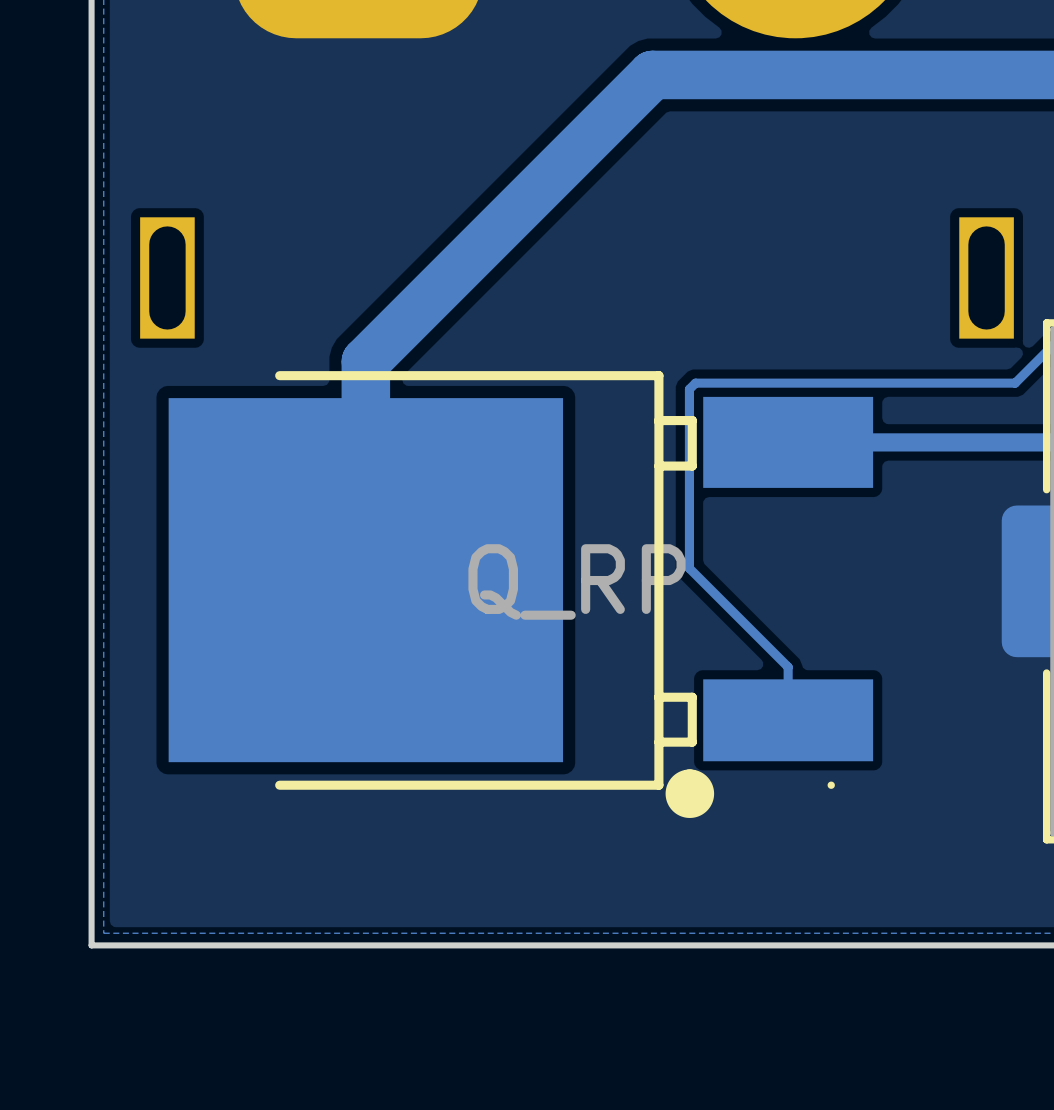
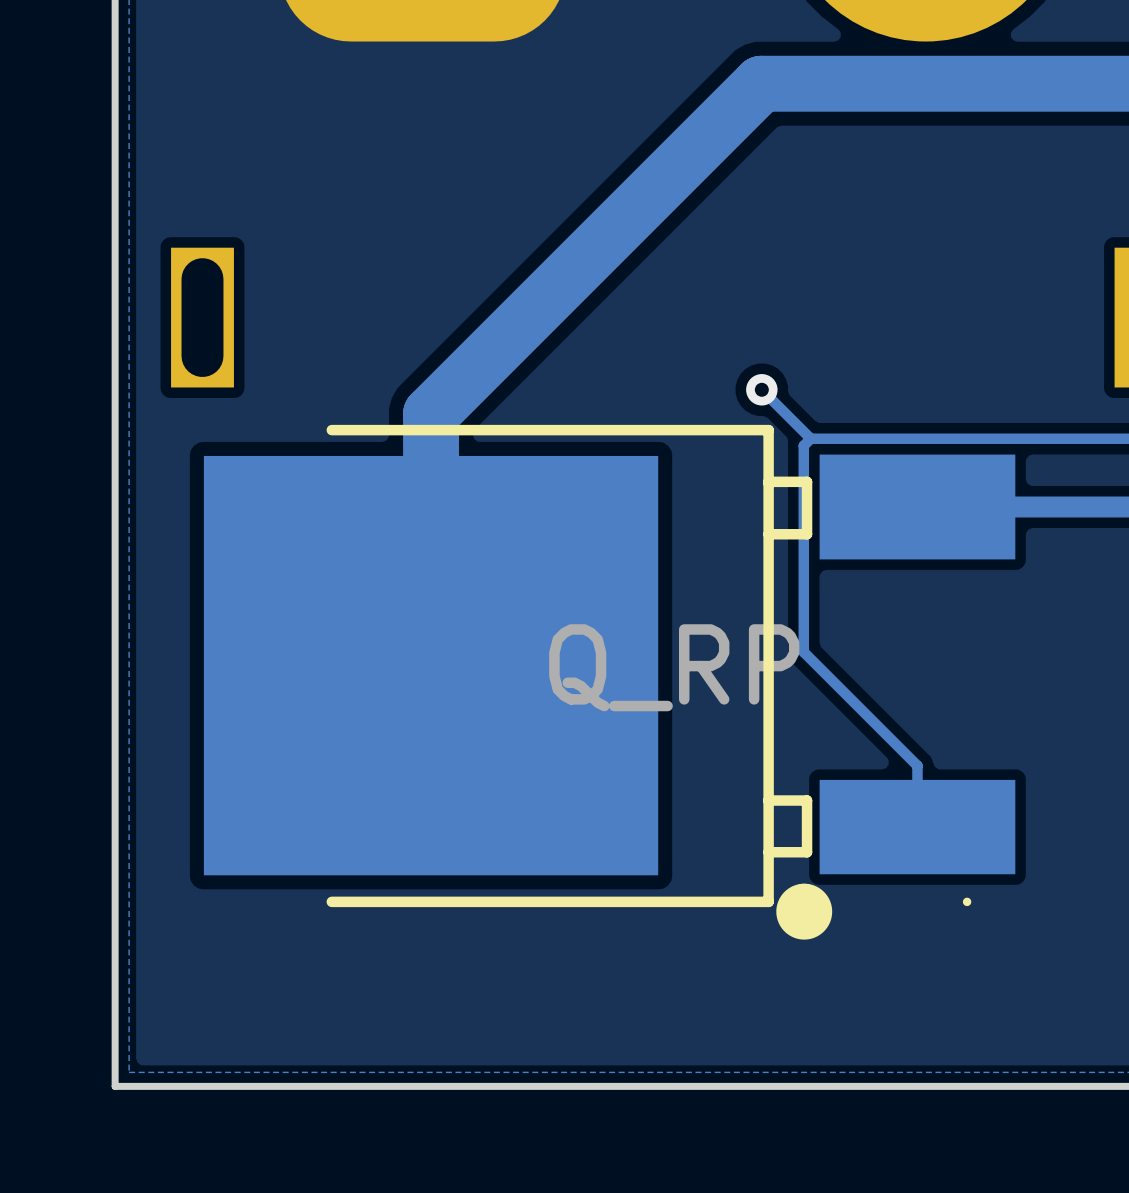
track: none -> (761, 389) (810, 438)
via: none -> (761, 389)

